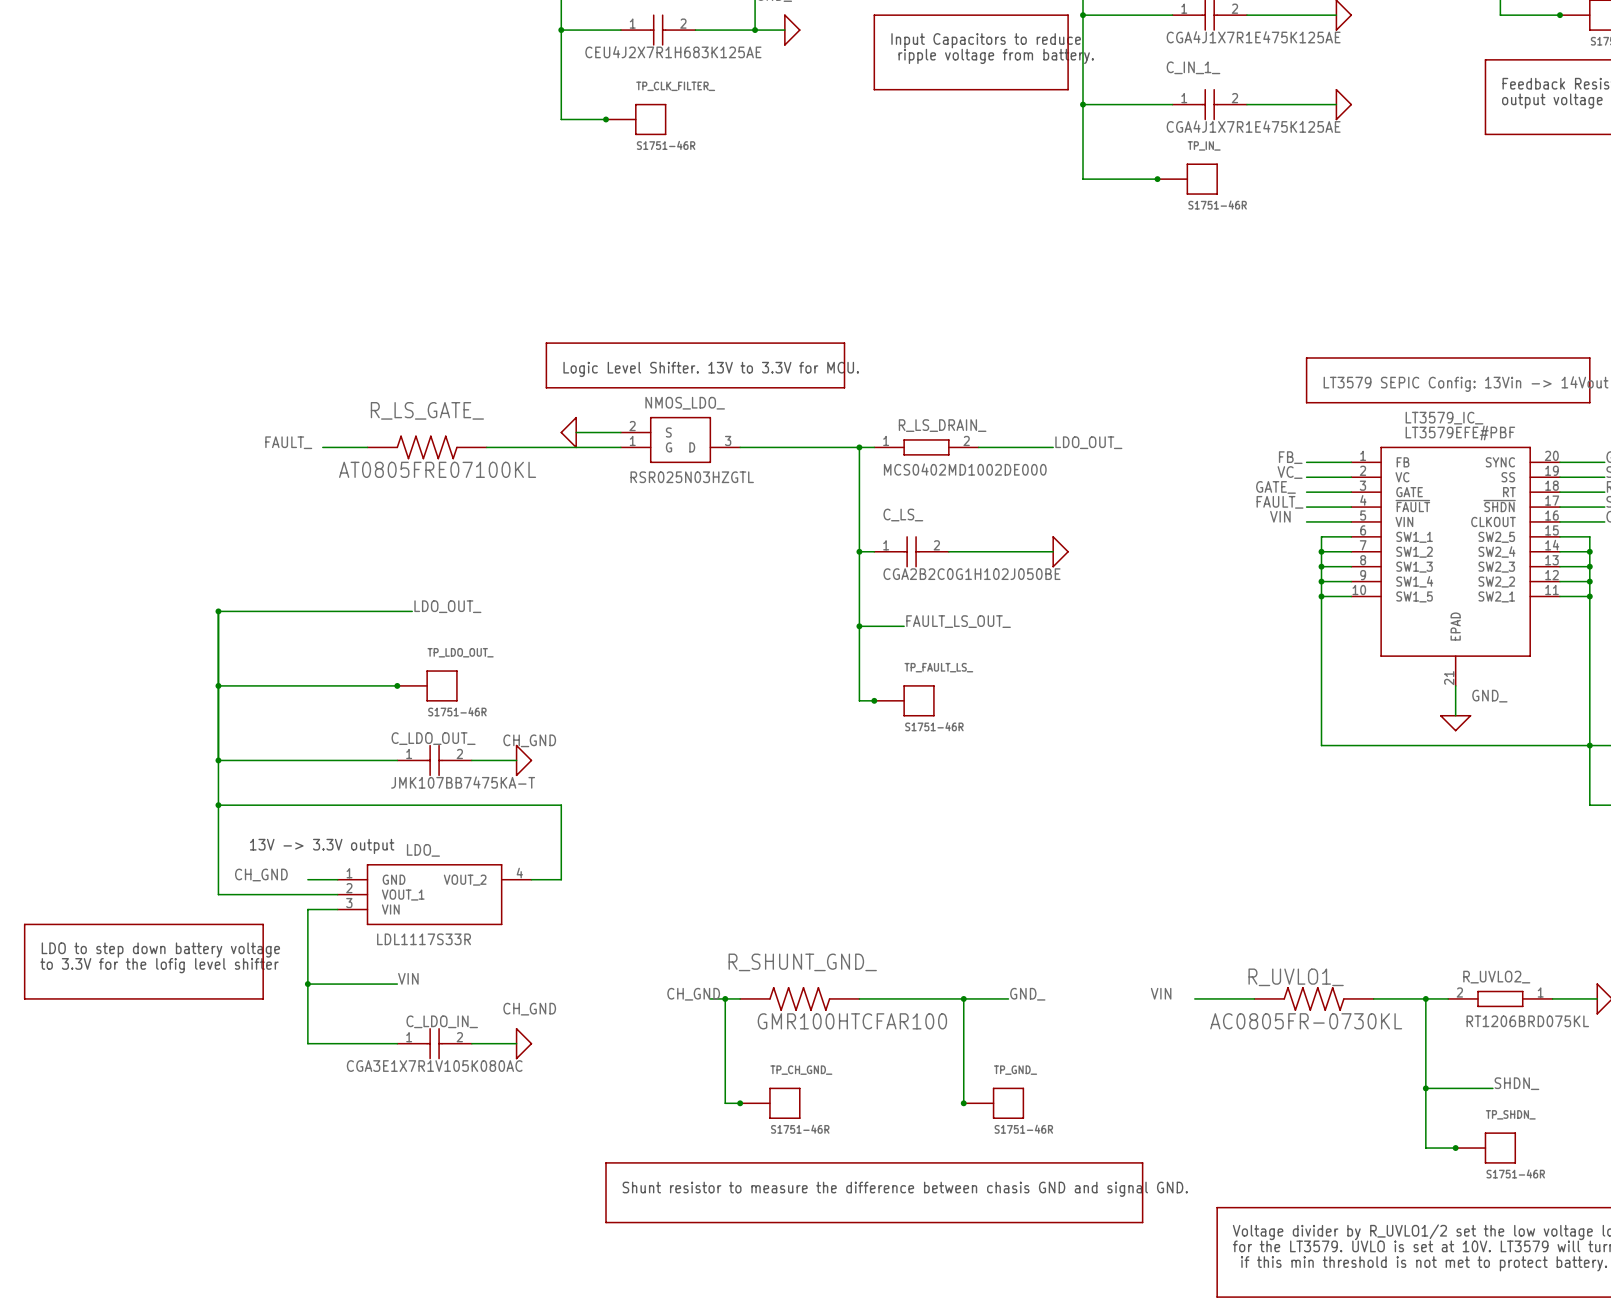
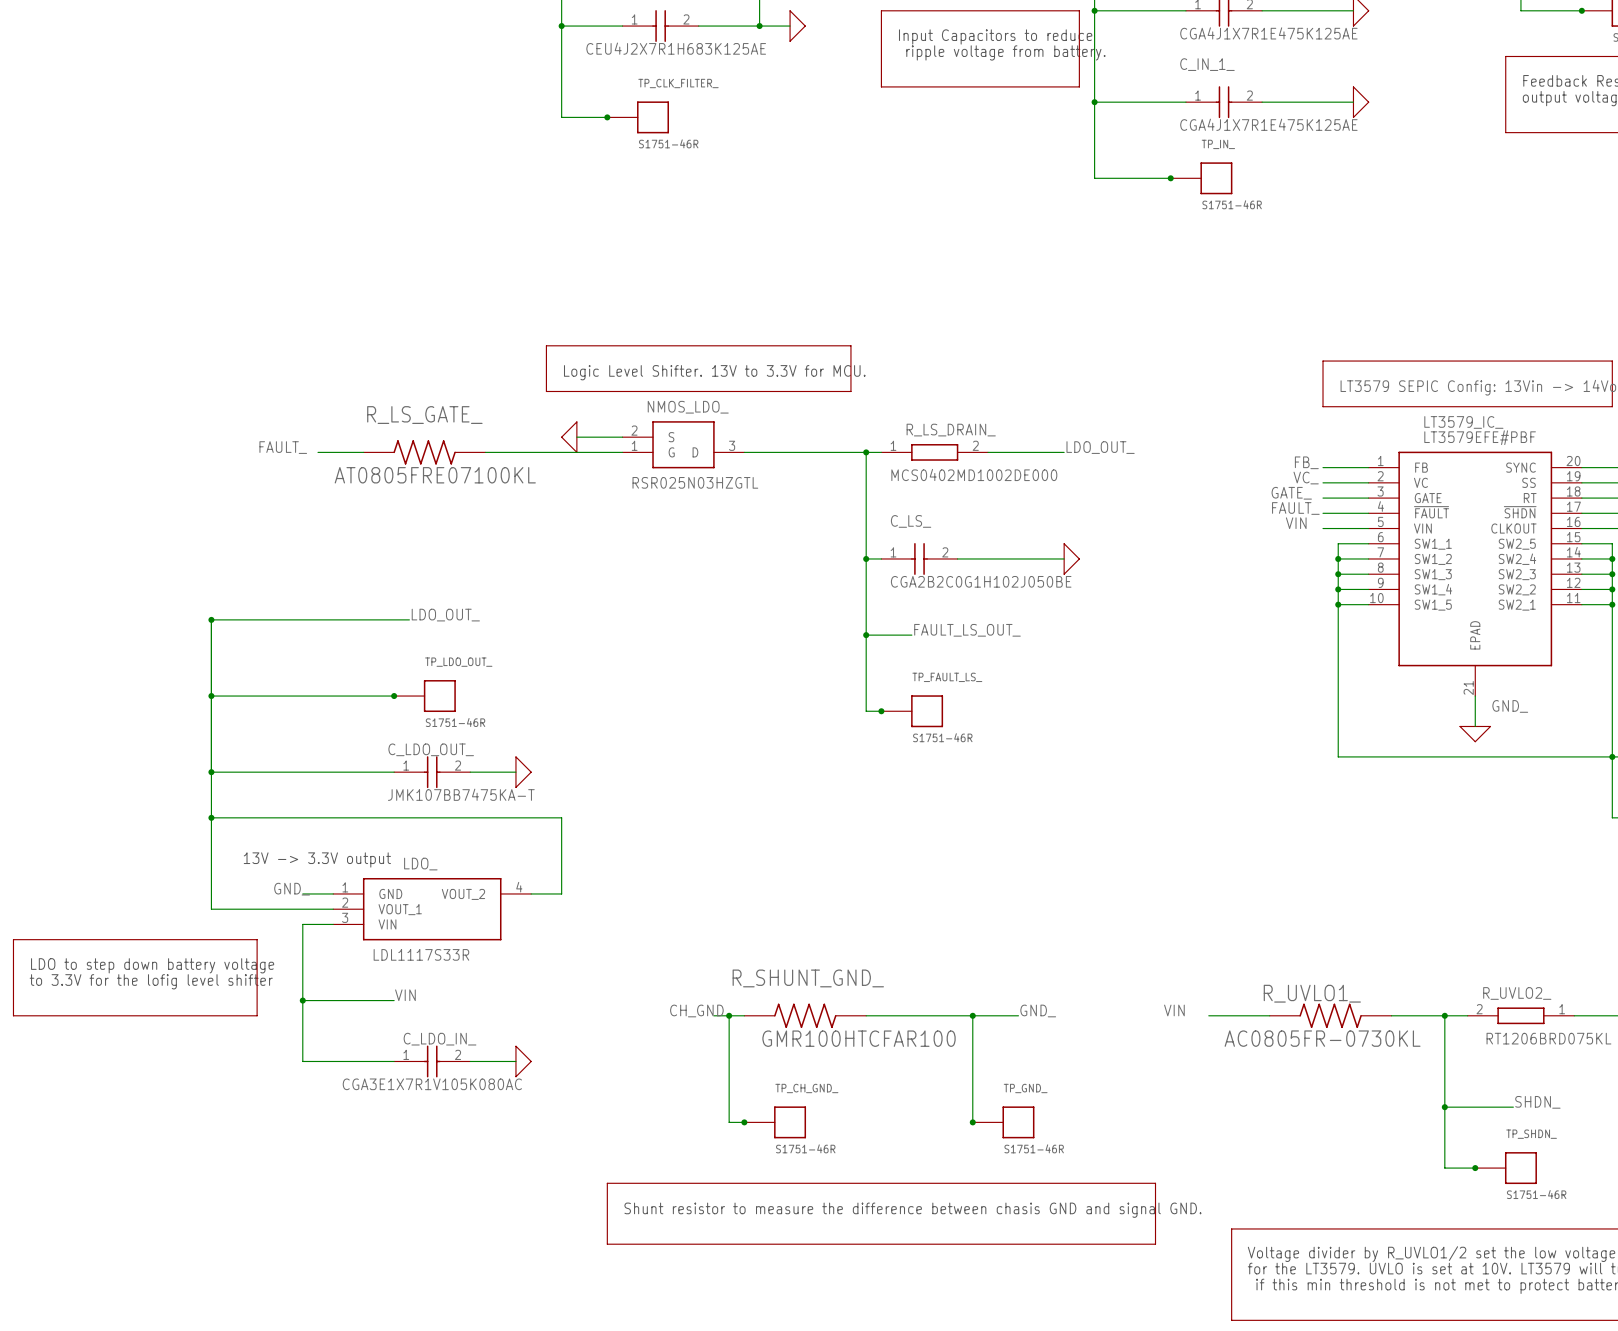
label: CH_GND (529, 740) -> none
label: CH_GND (261, 874) -> none
label: none -> GND_ (292, 889)
label: CH_GND (529, 1009) -> none

